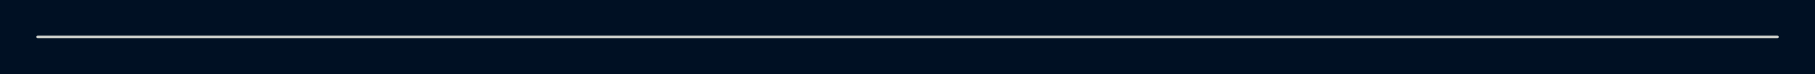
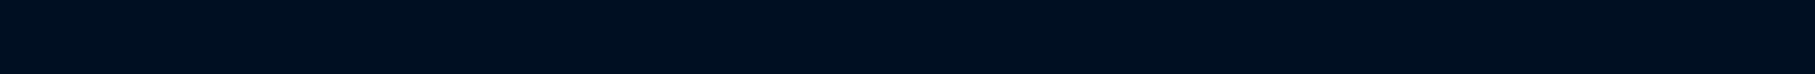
board edge: (37, 36) (1777, 36) -> none

